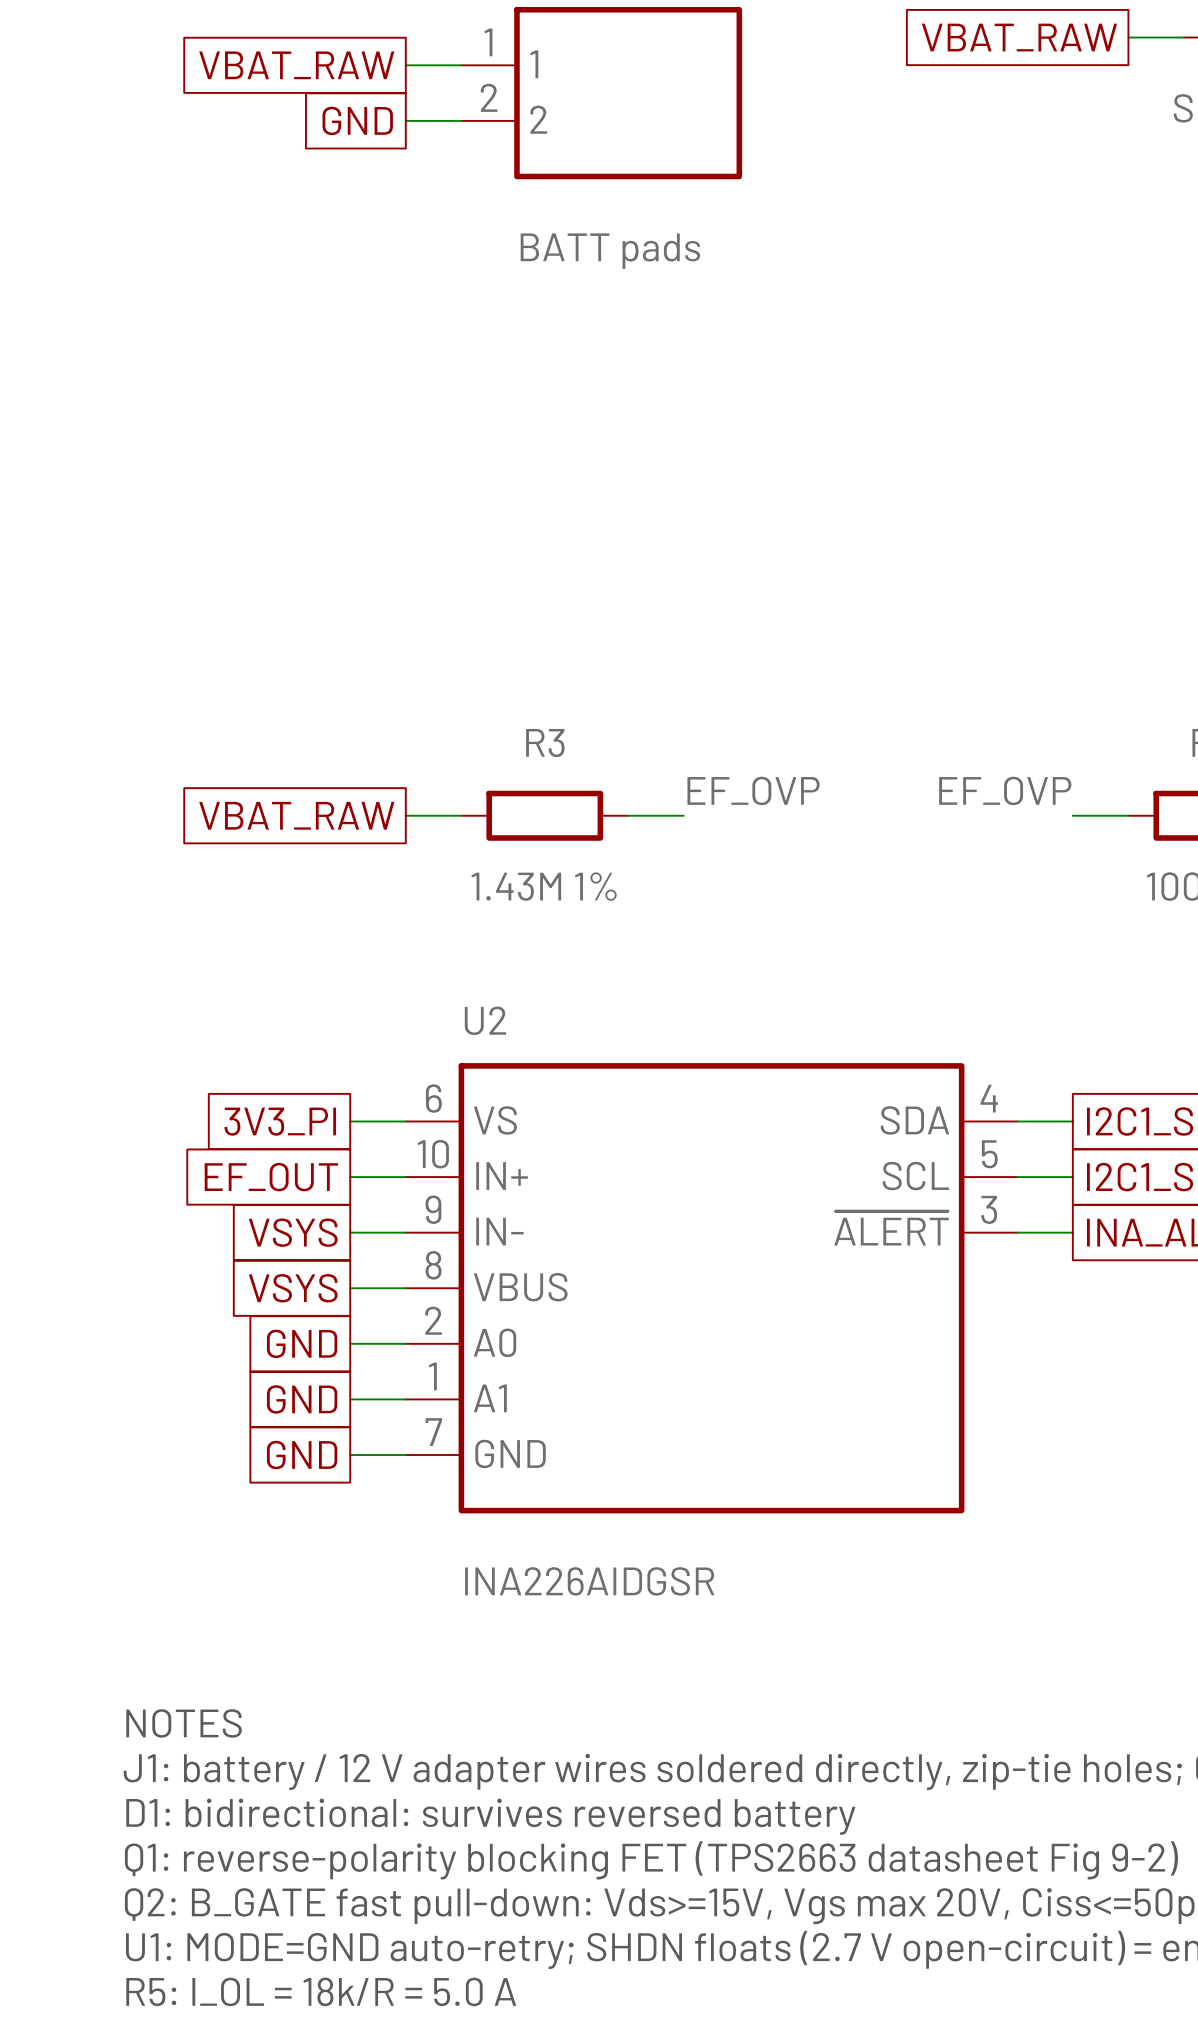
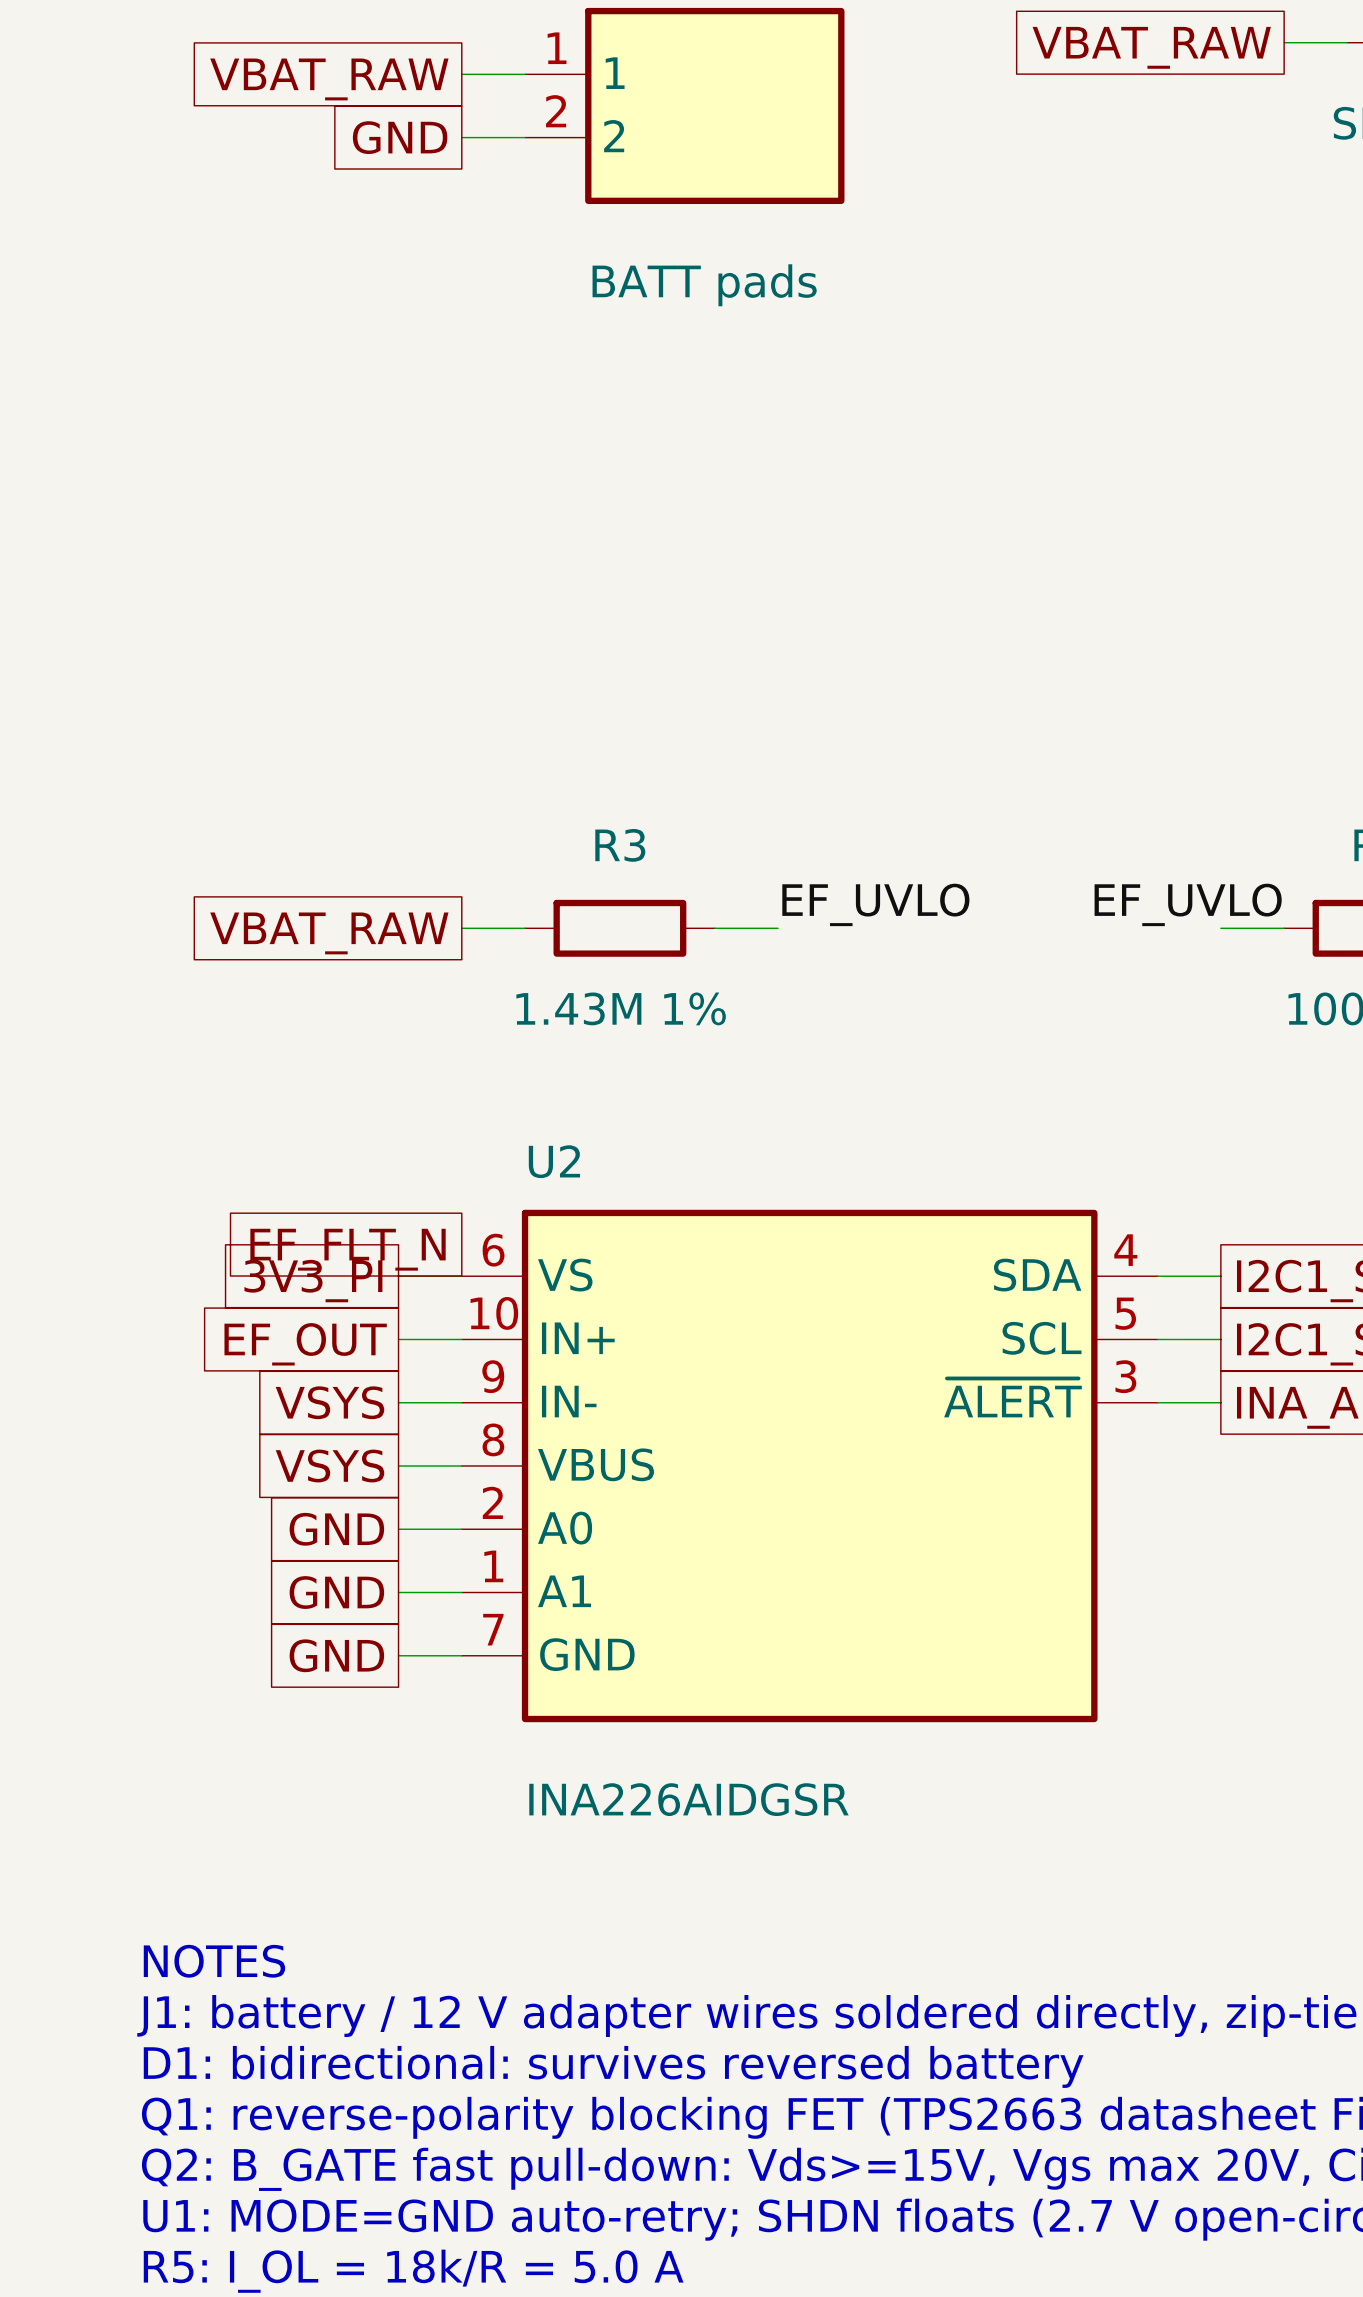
label: EF_OVP (753, 790) -> EF_UVLO (875, 904)
label: EF_OVP (1005, 790) -> EF_UVLO (1188, 904)
global label: none -> EF_FLT_N (348, 1249)

